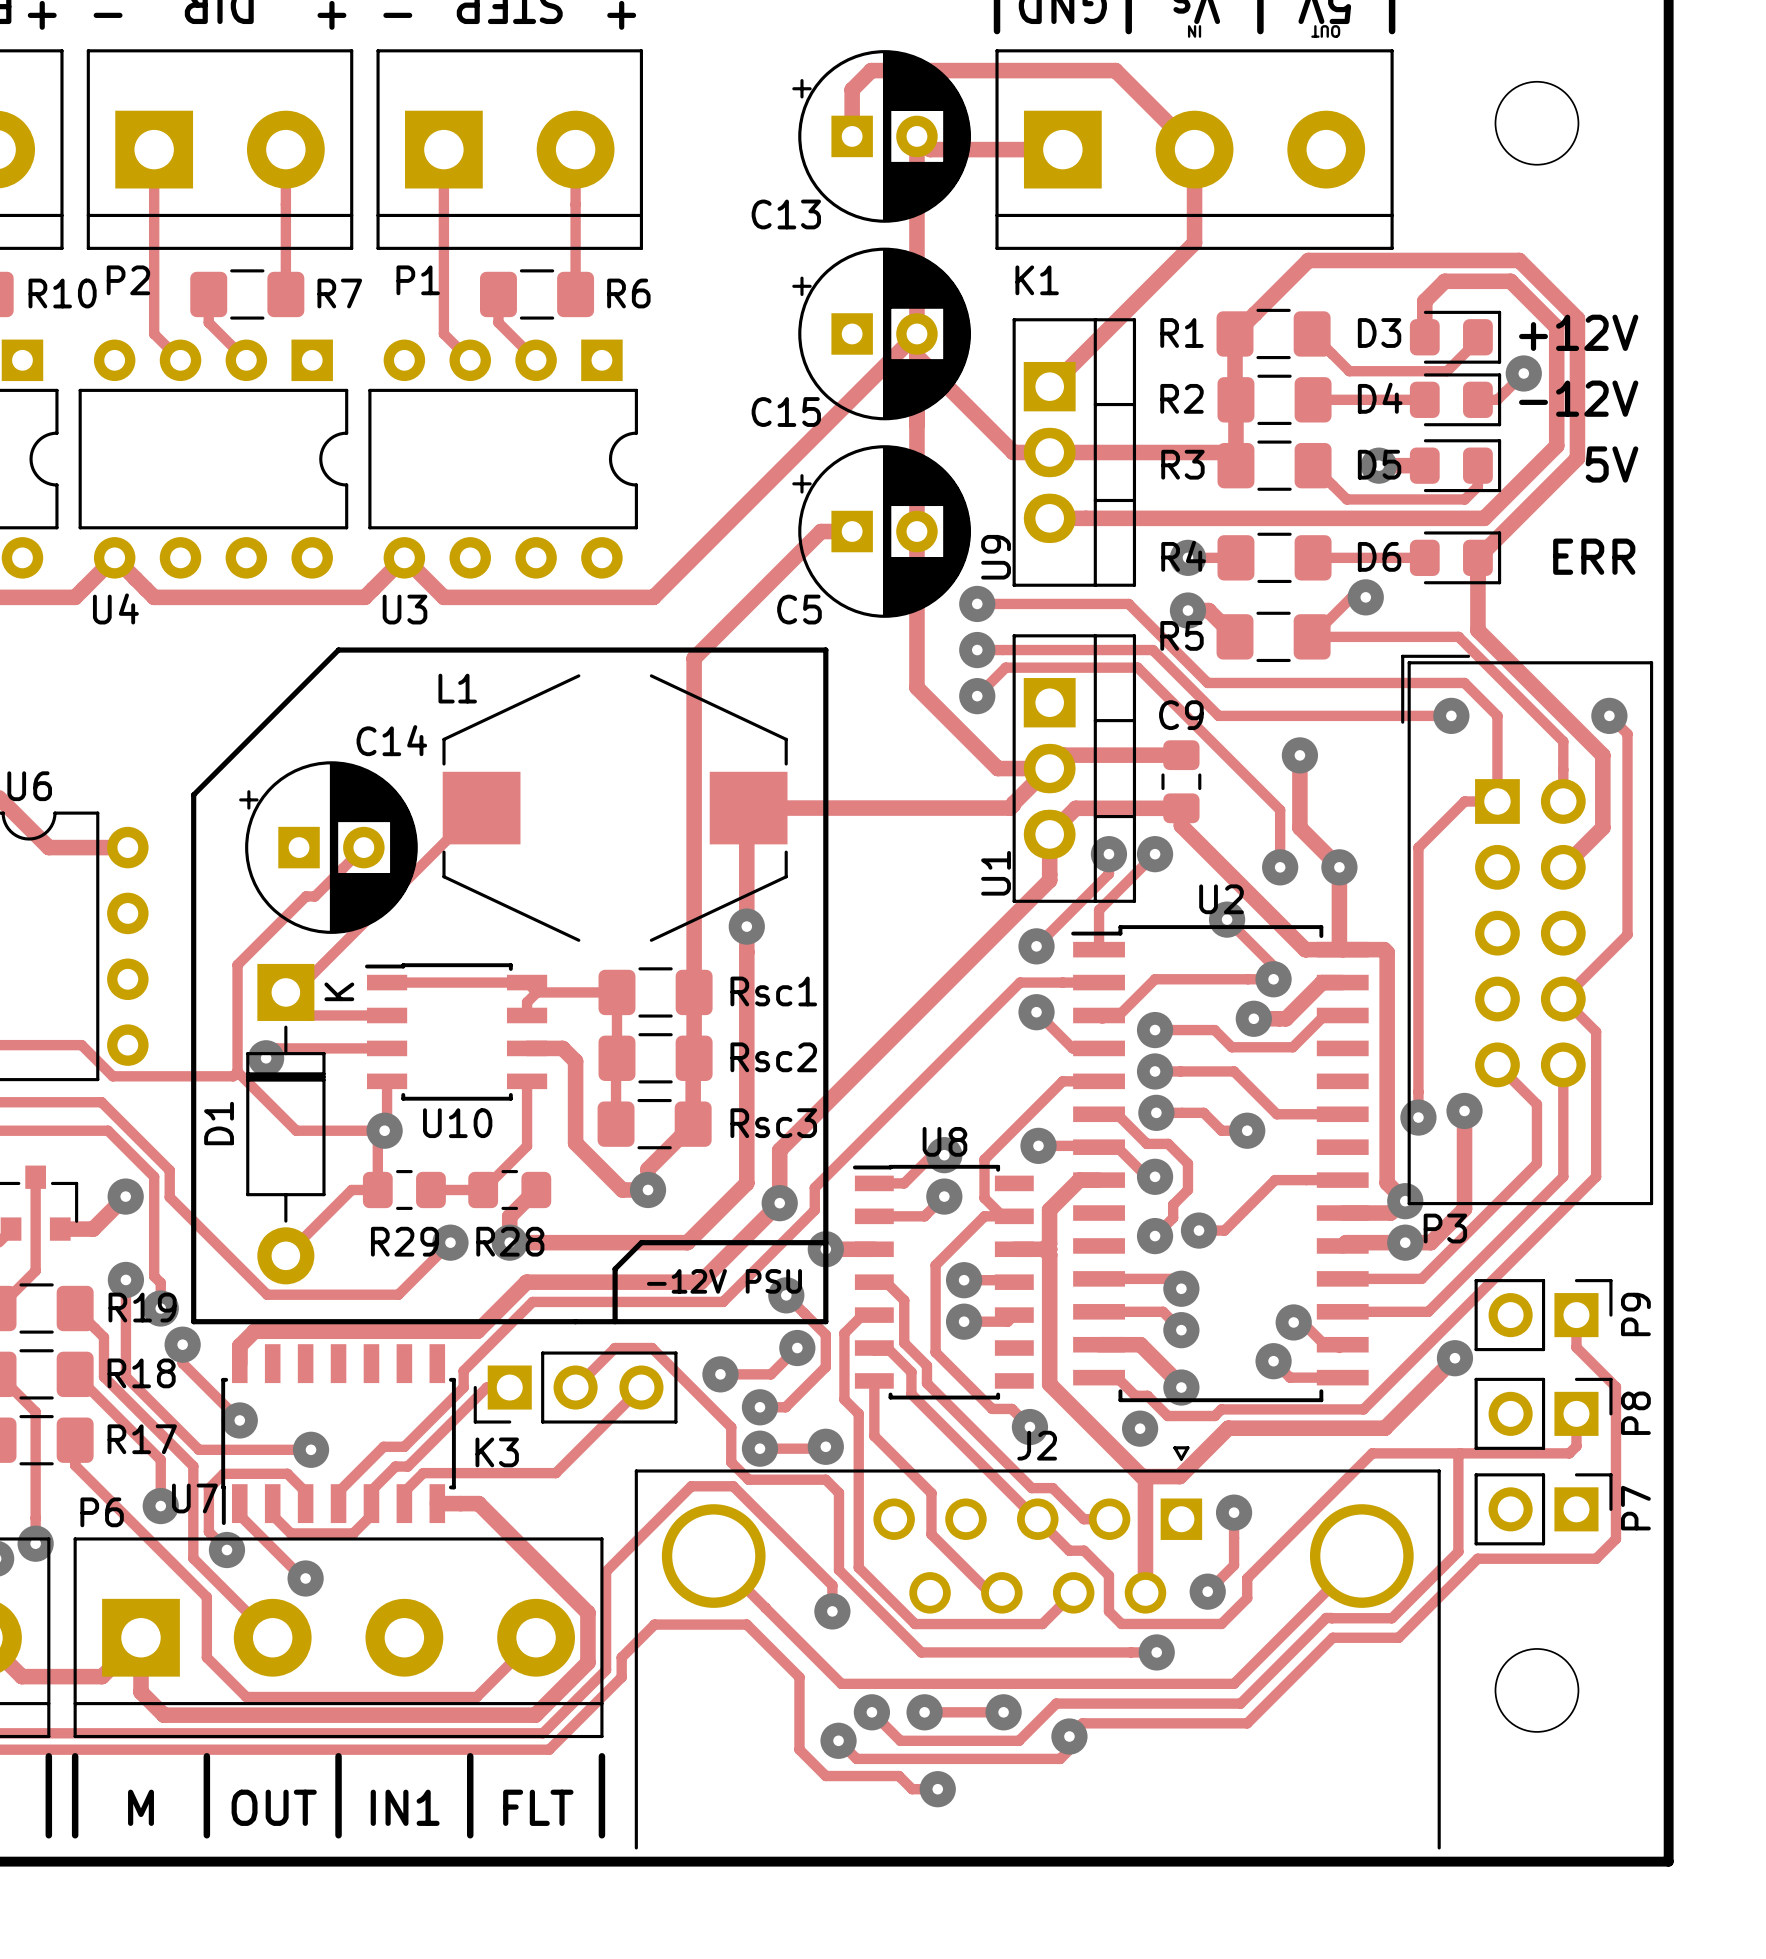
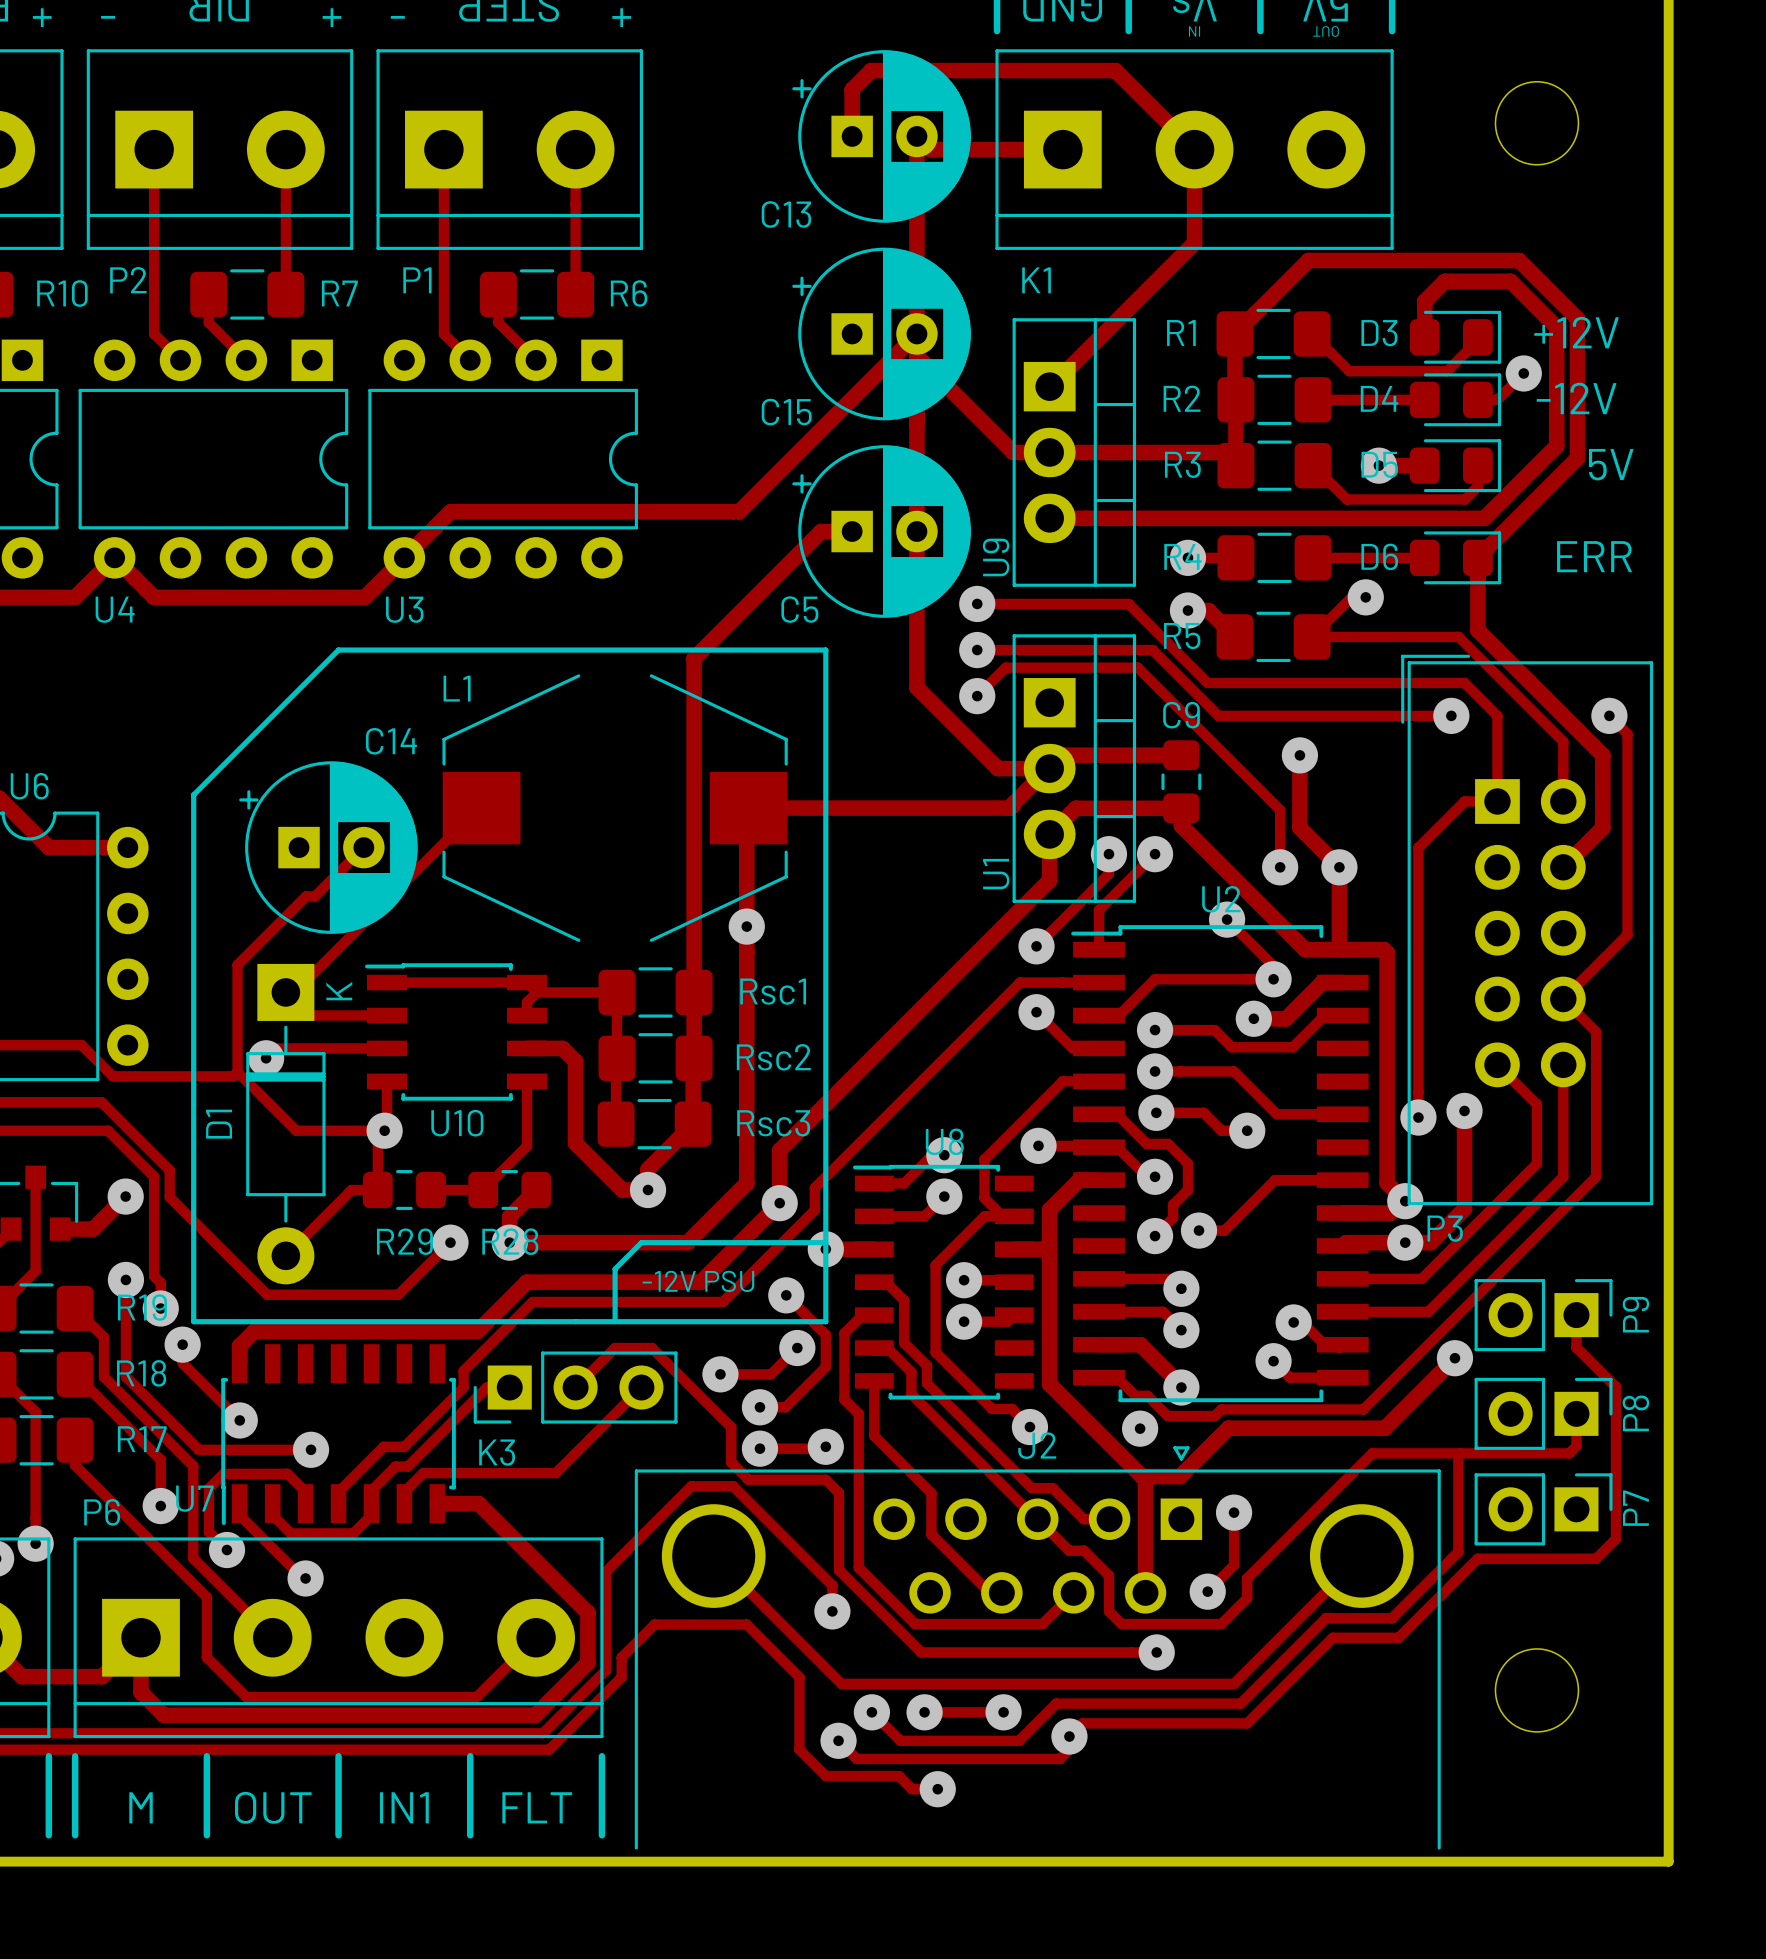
track: (739, 511) (653, 597) (443, 597) (404, 557) -> (739, 511) (450, 511) (404, 557)

